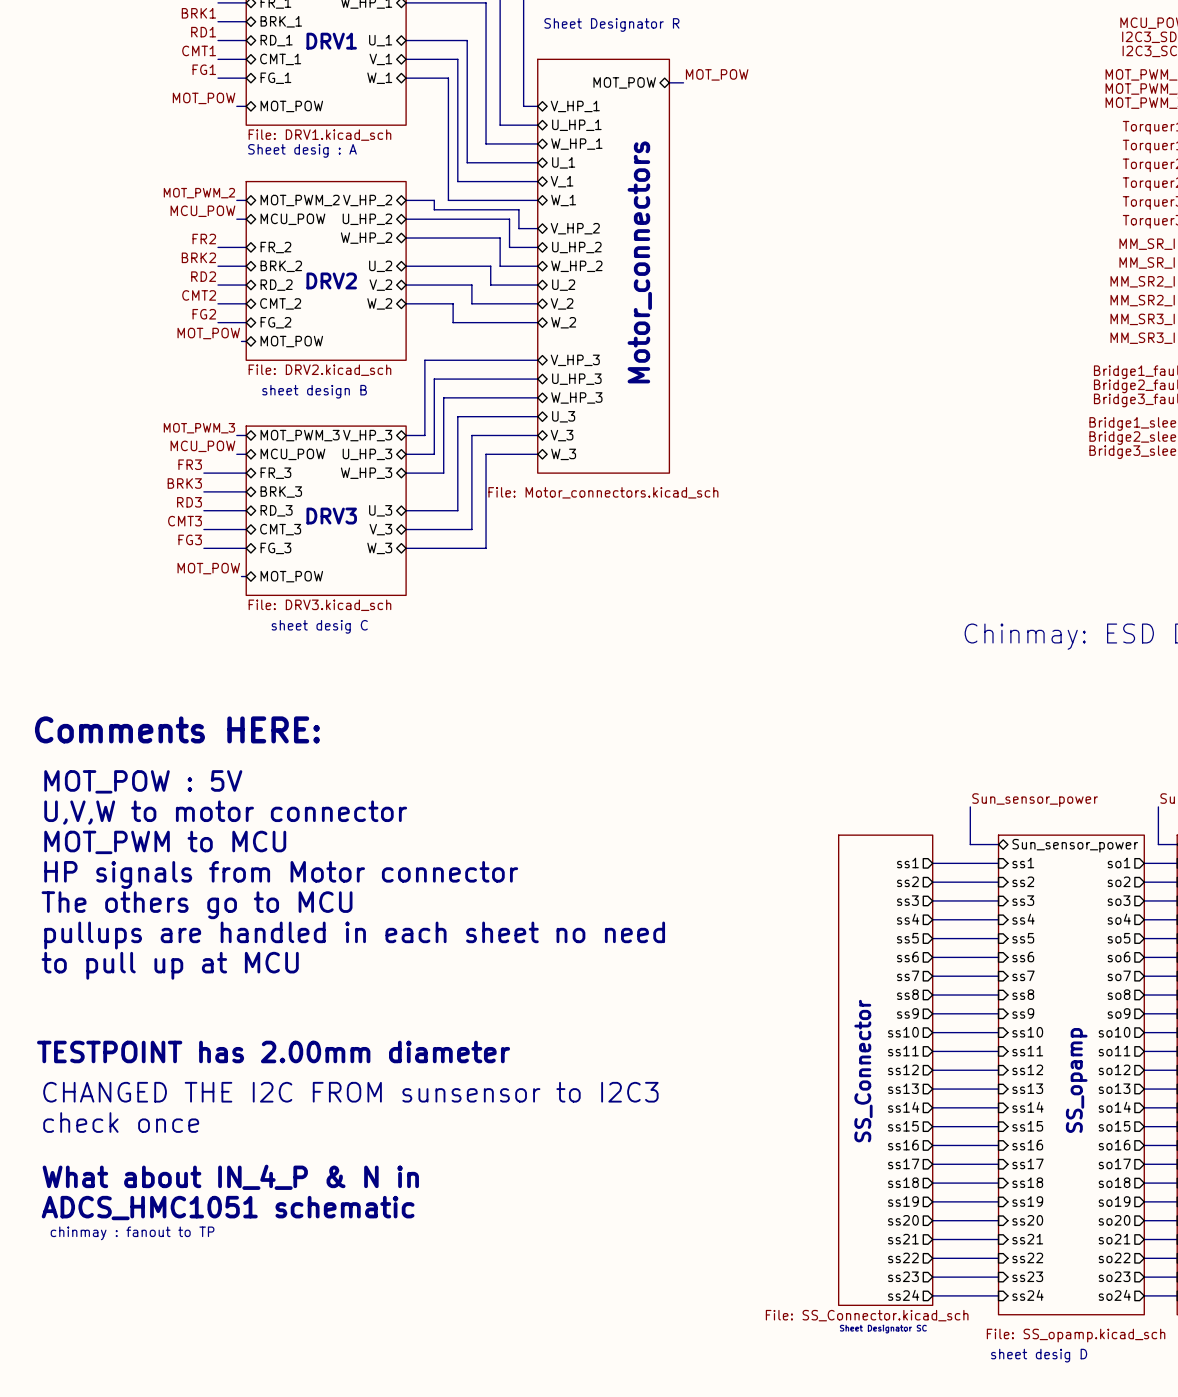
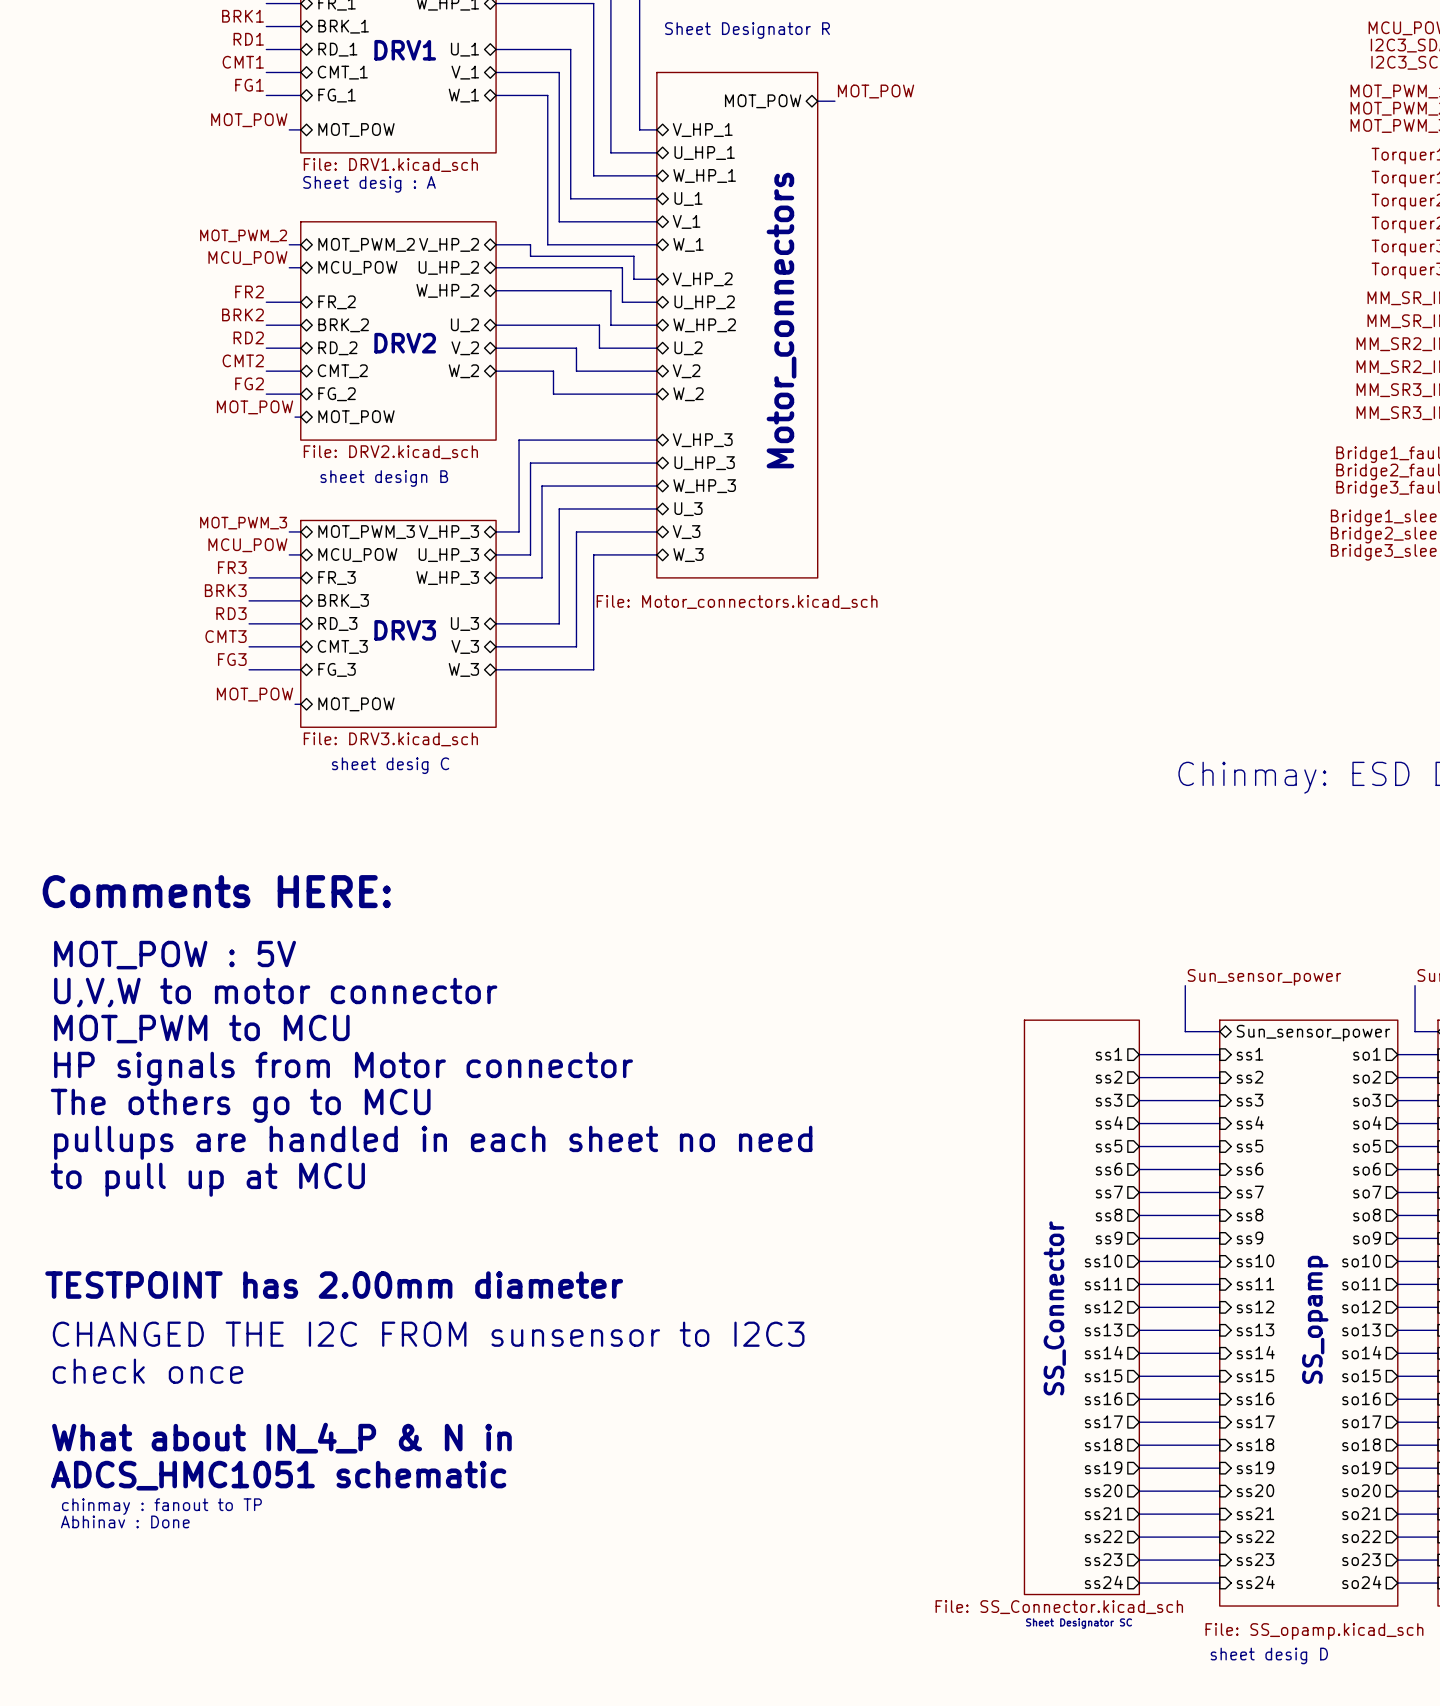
text: none -> Abhinav : Done (125, 1521)

